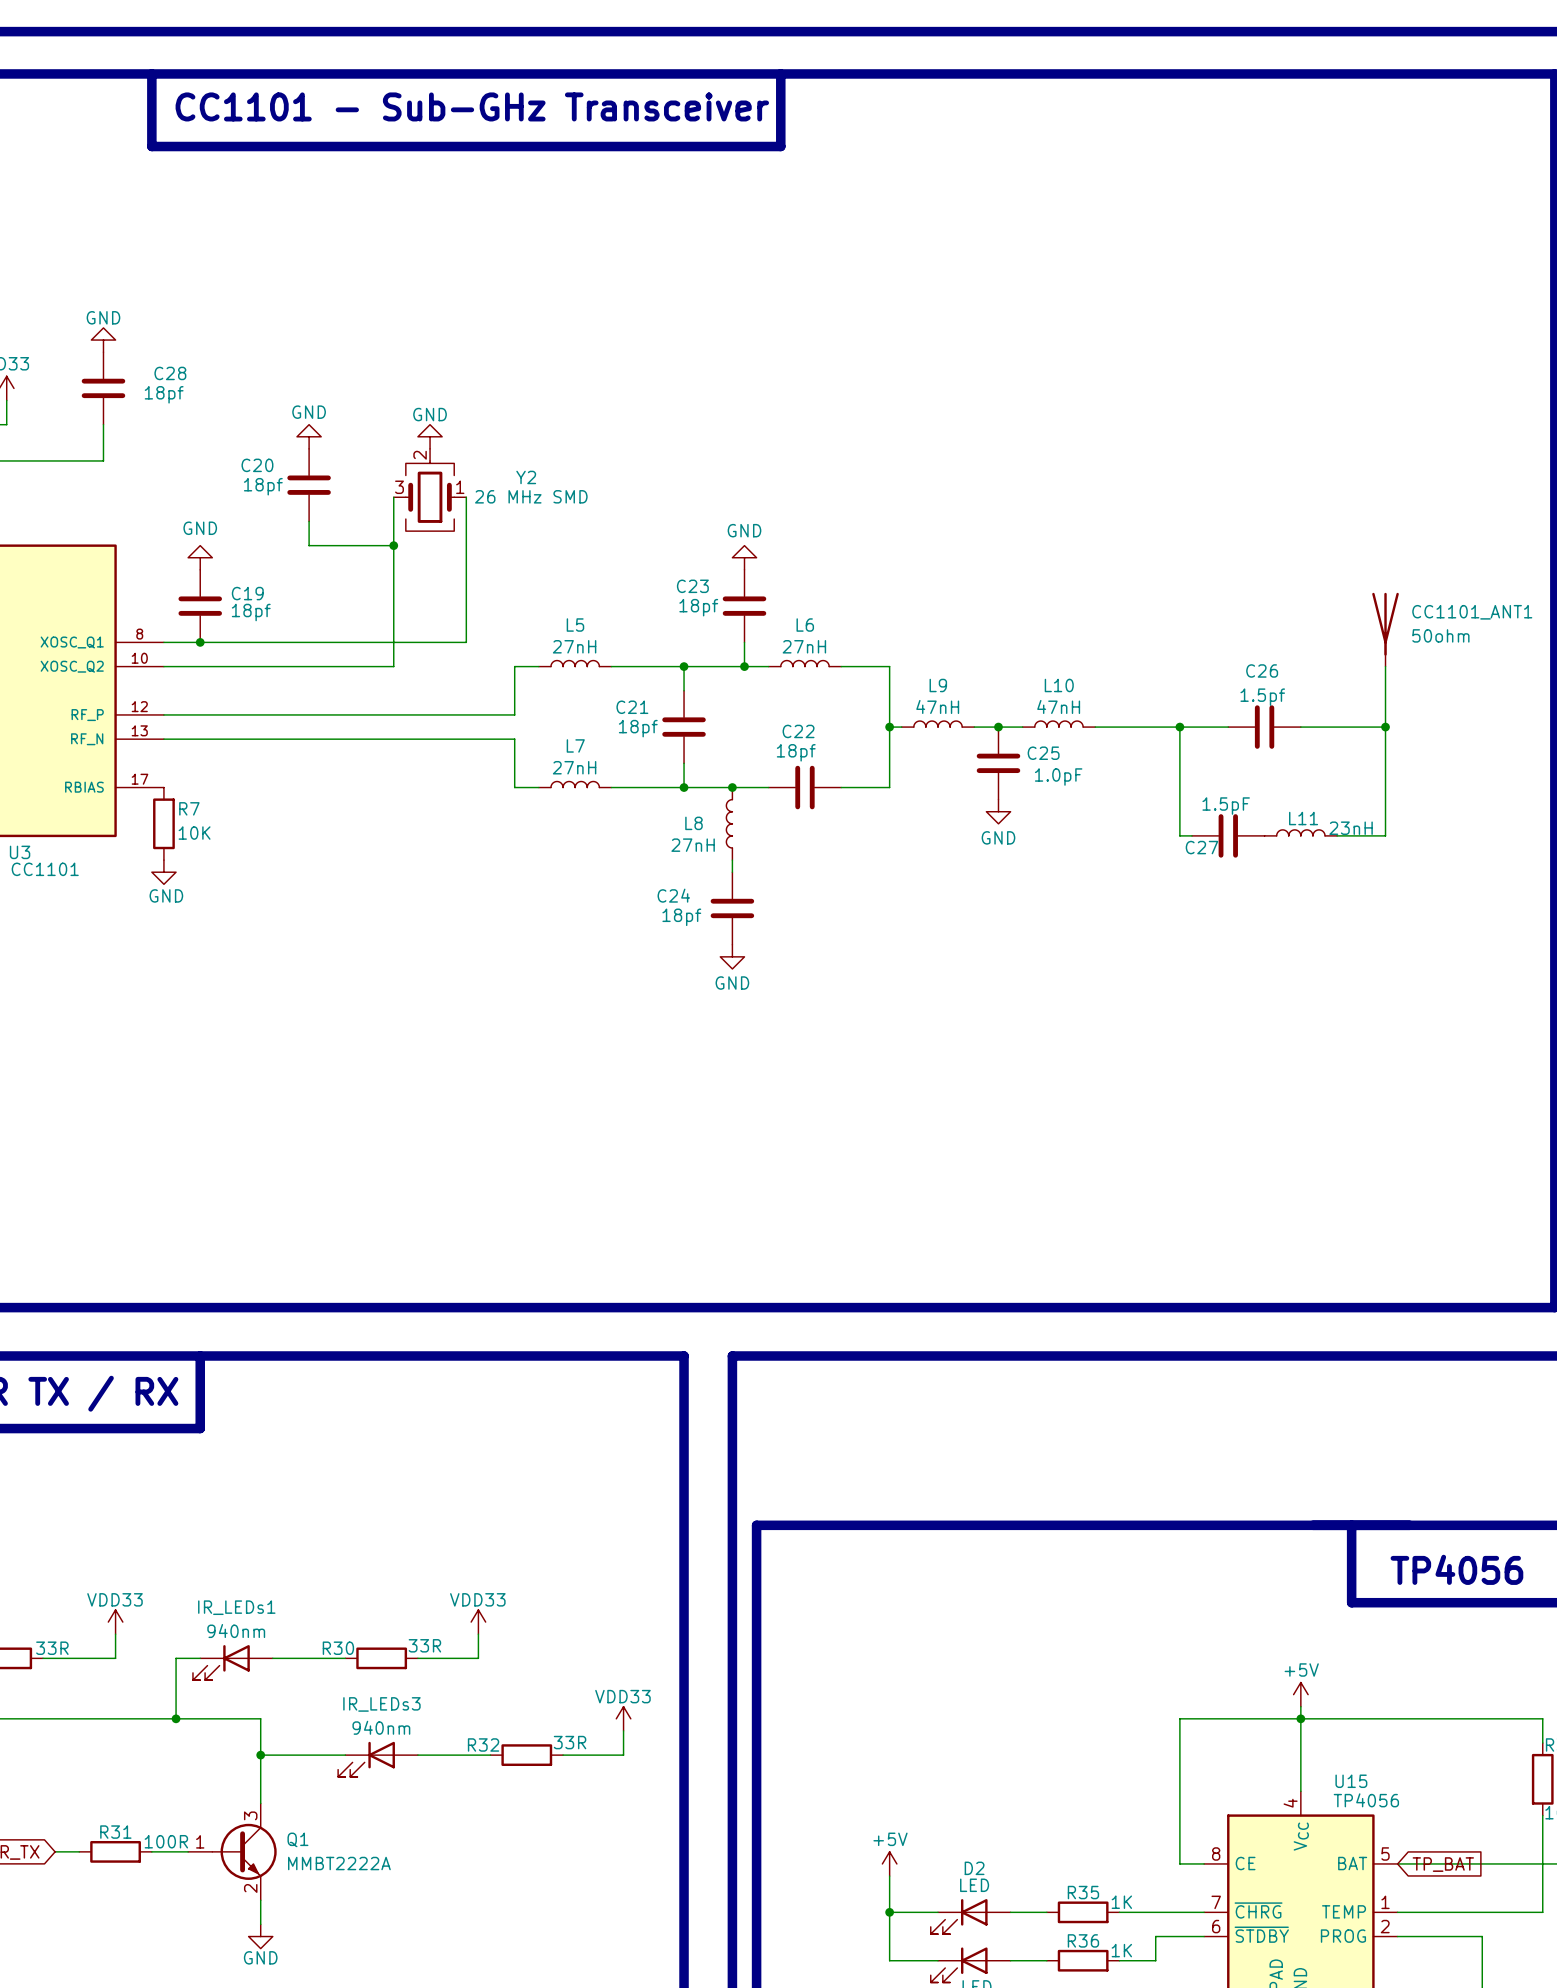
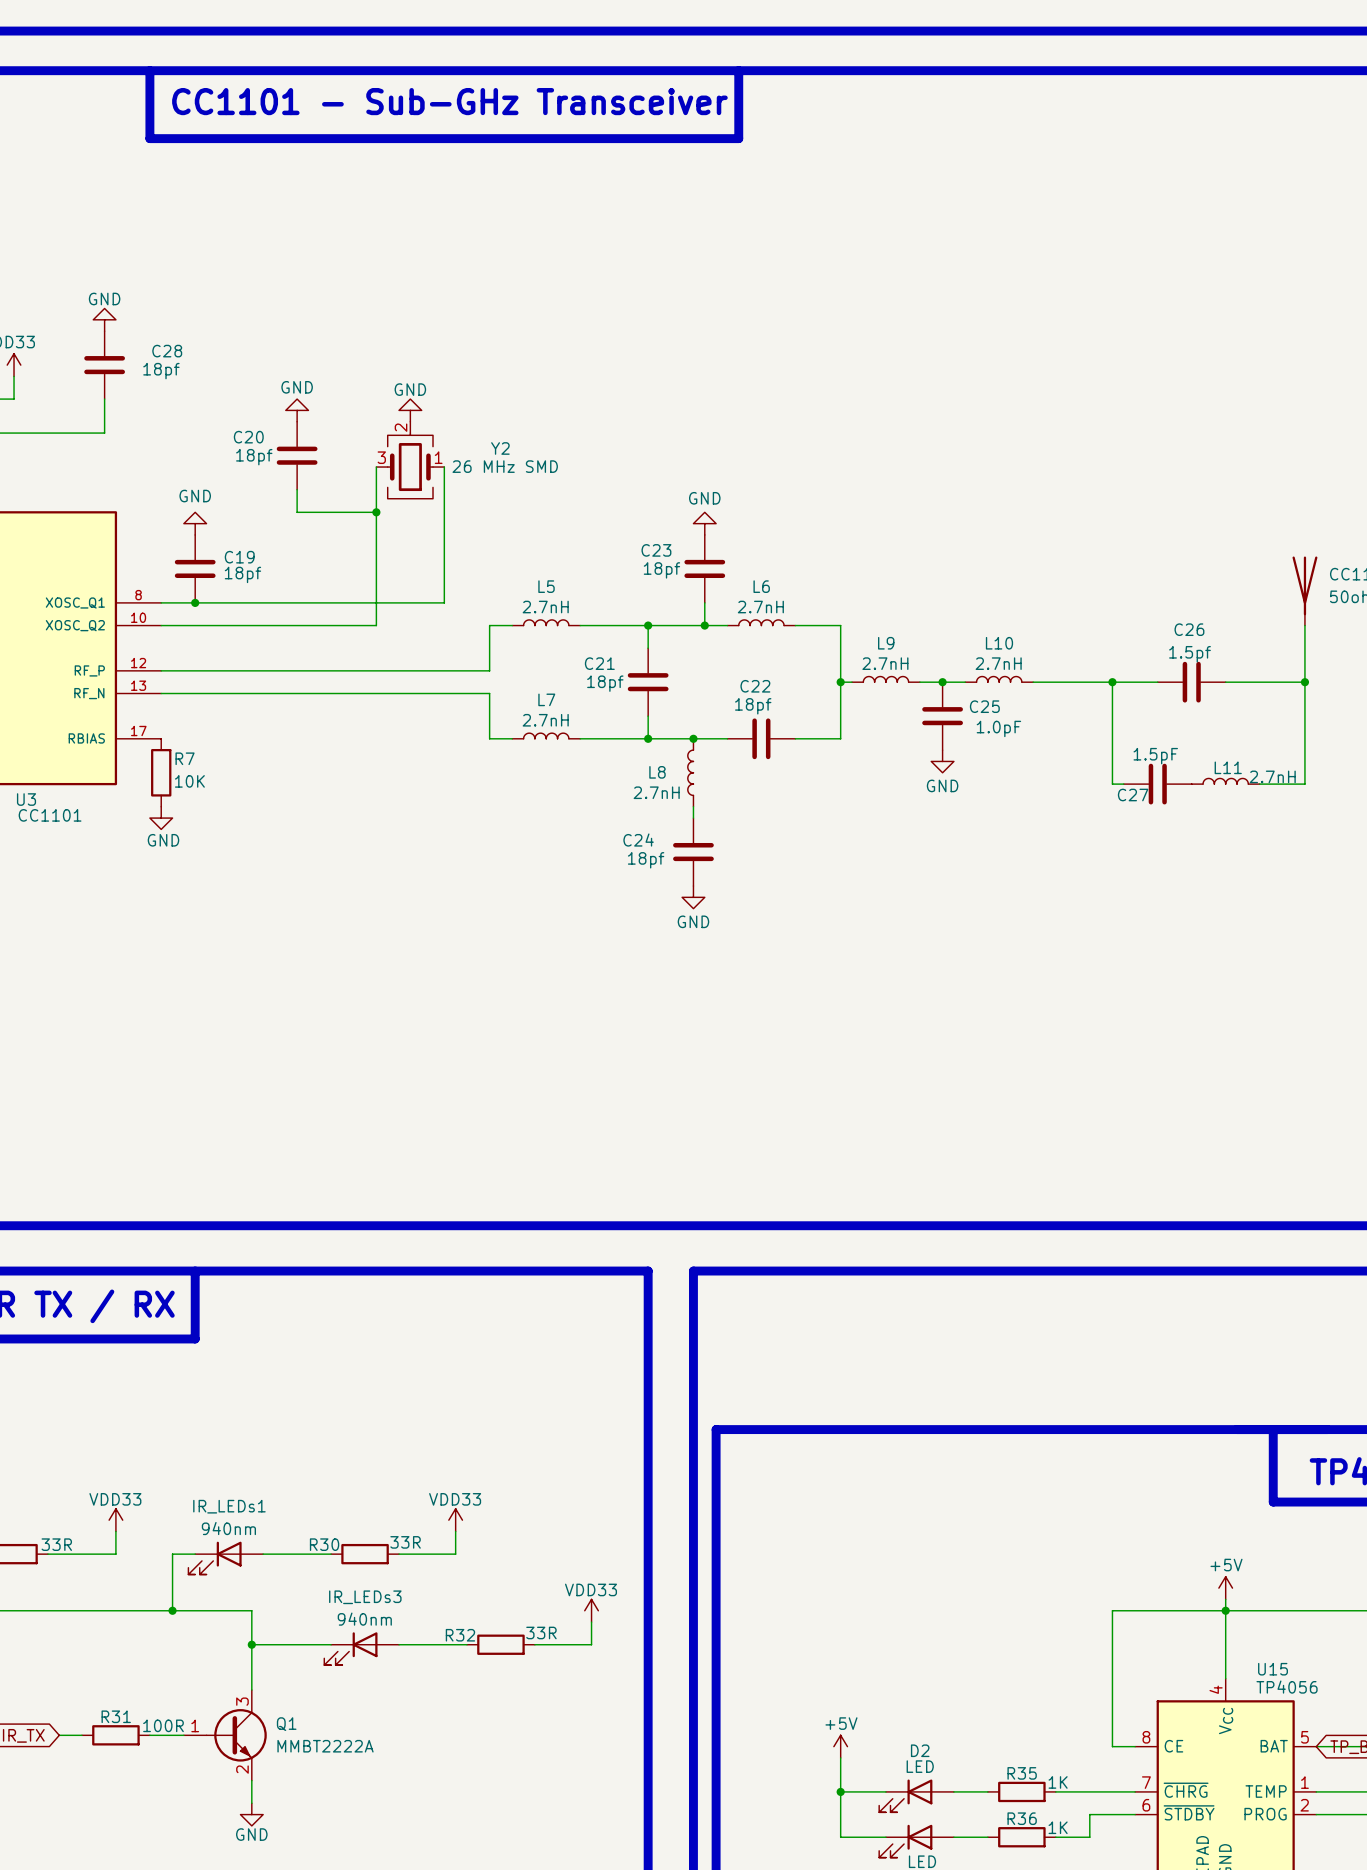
L5 value: 27nH (574, 646) -> 2.7nH (545, 607)
L6 value: 27nH (804, 646) -> 2.7nH (760, 607)
L9 value: 47nH (937, 706) -> 2.7nH (885, 663)
L10 value: 47nH (1058, 706) -> 2.7nH (998, 663)
L7 value: 27nH (574, 767) -> 2.7nH (545, 720)
L11 value: 23nH (1351, 828) -> 2.7nH (1272, 776)
L8 value: 27nH (693, 845) -> 2.7nH (656, 792)

